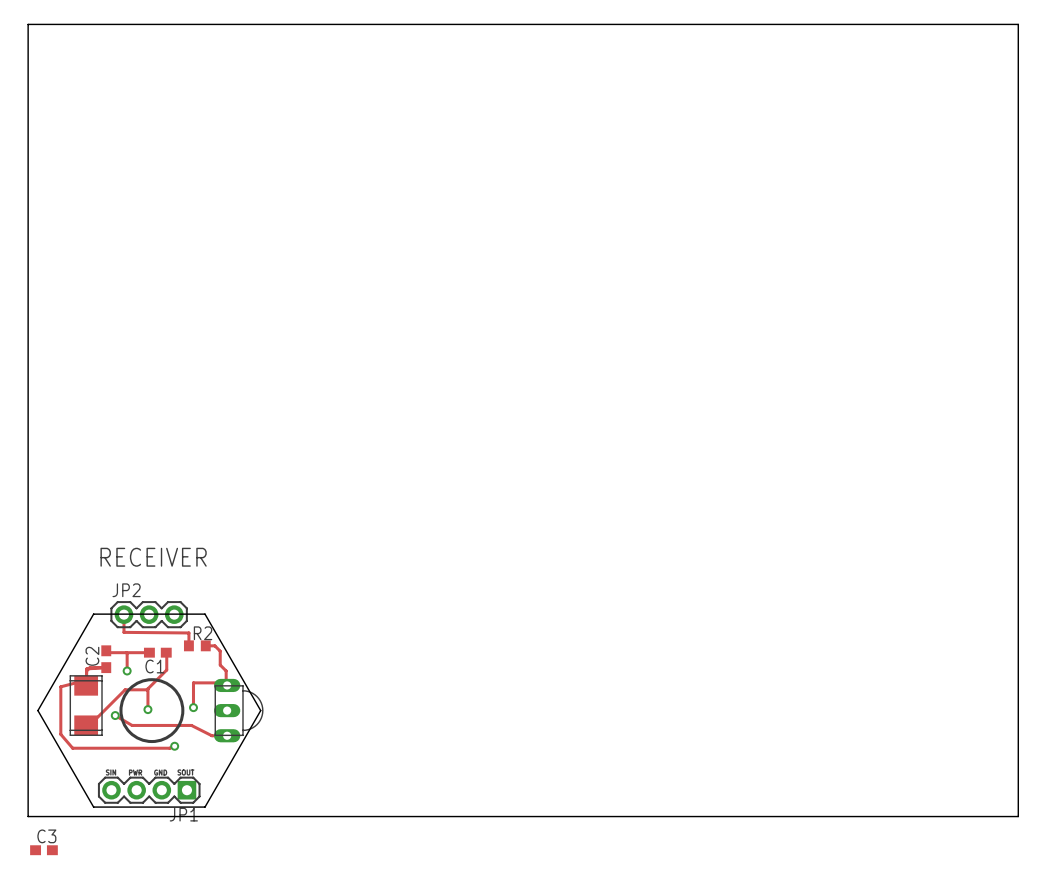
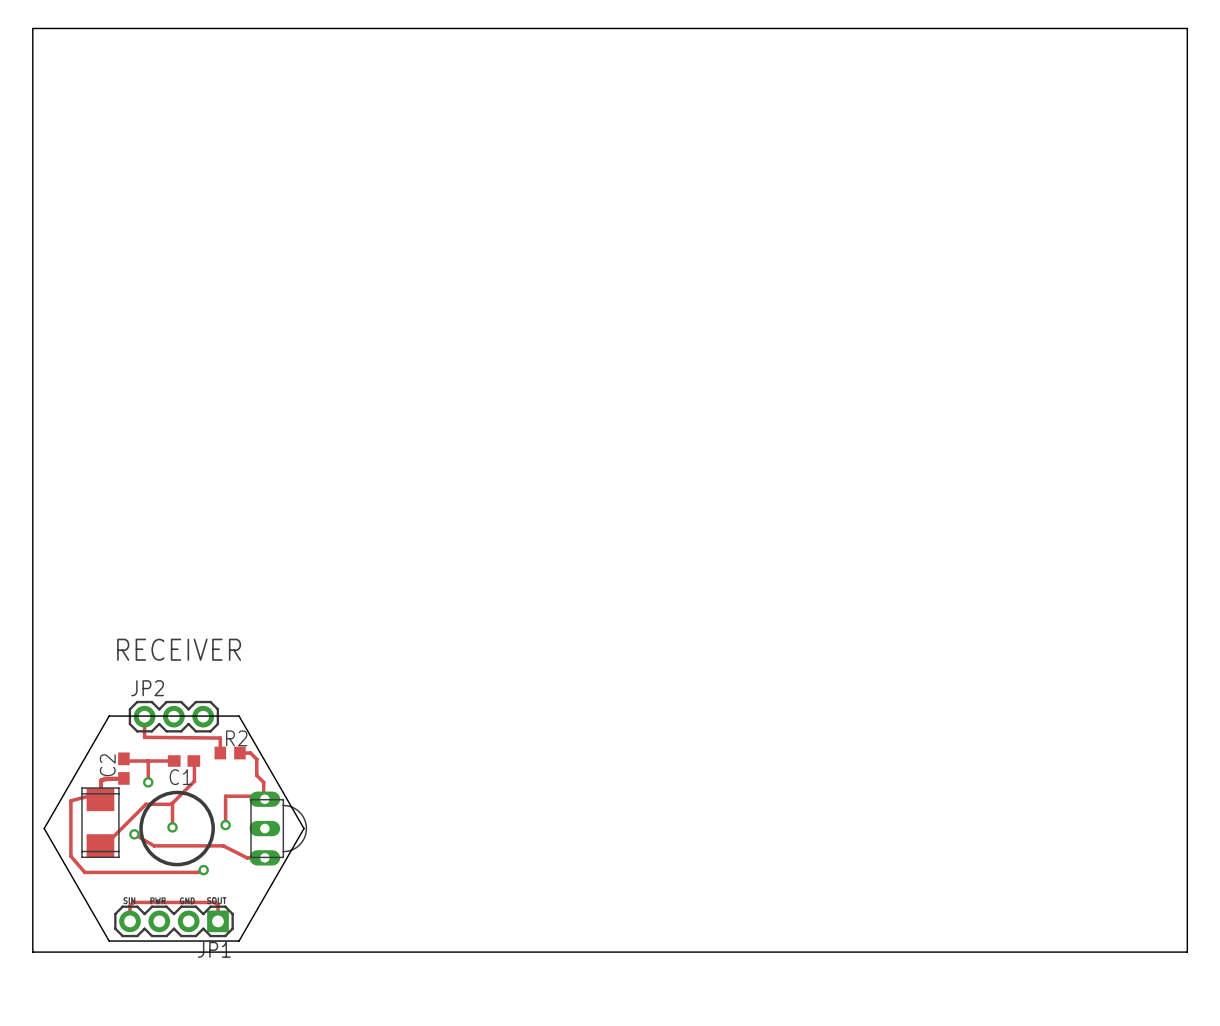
track: none -> (130, 921) (130, 905) (133, 902) (215, 902) (217, 905) (217, 921)
C3: (43, 850) -> none

